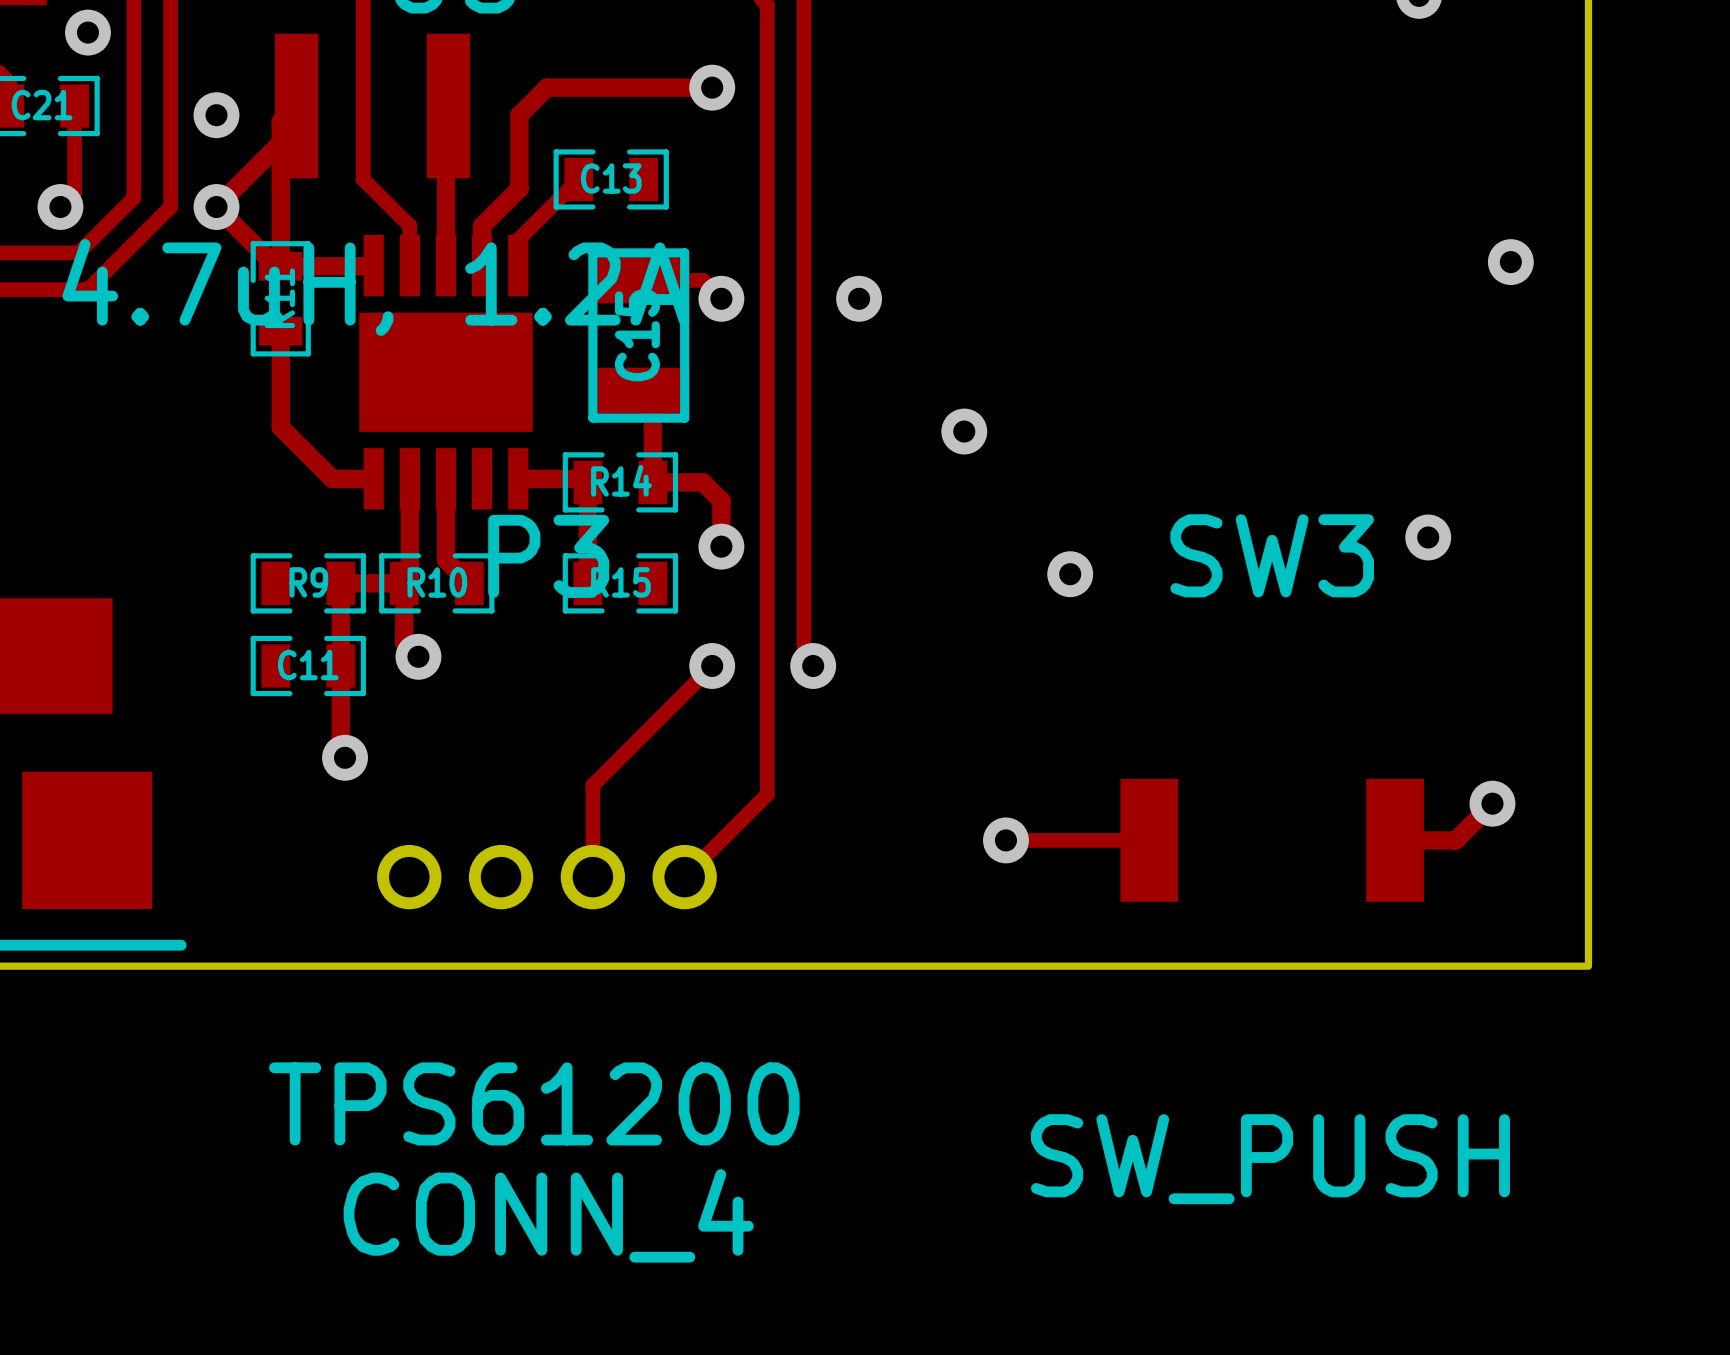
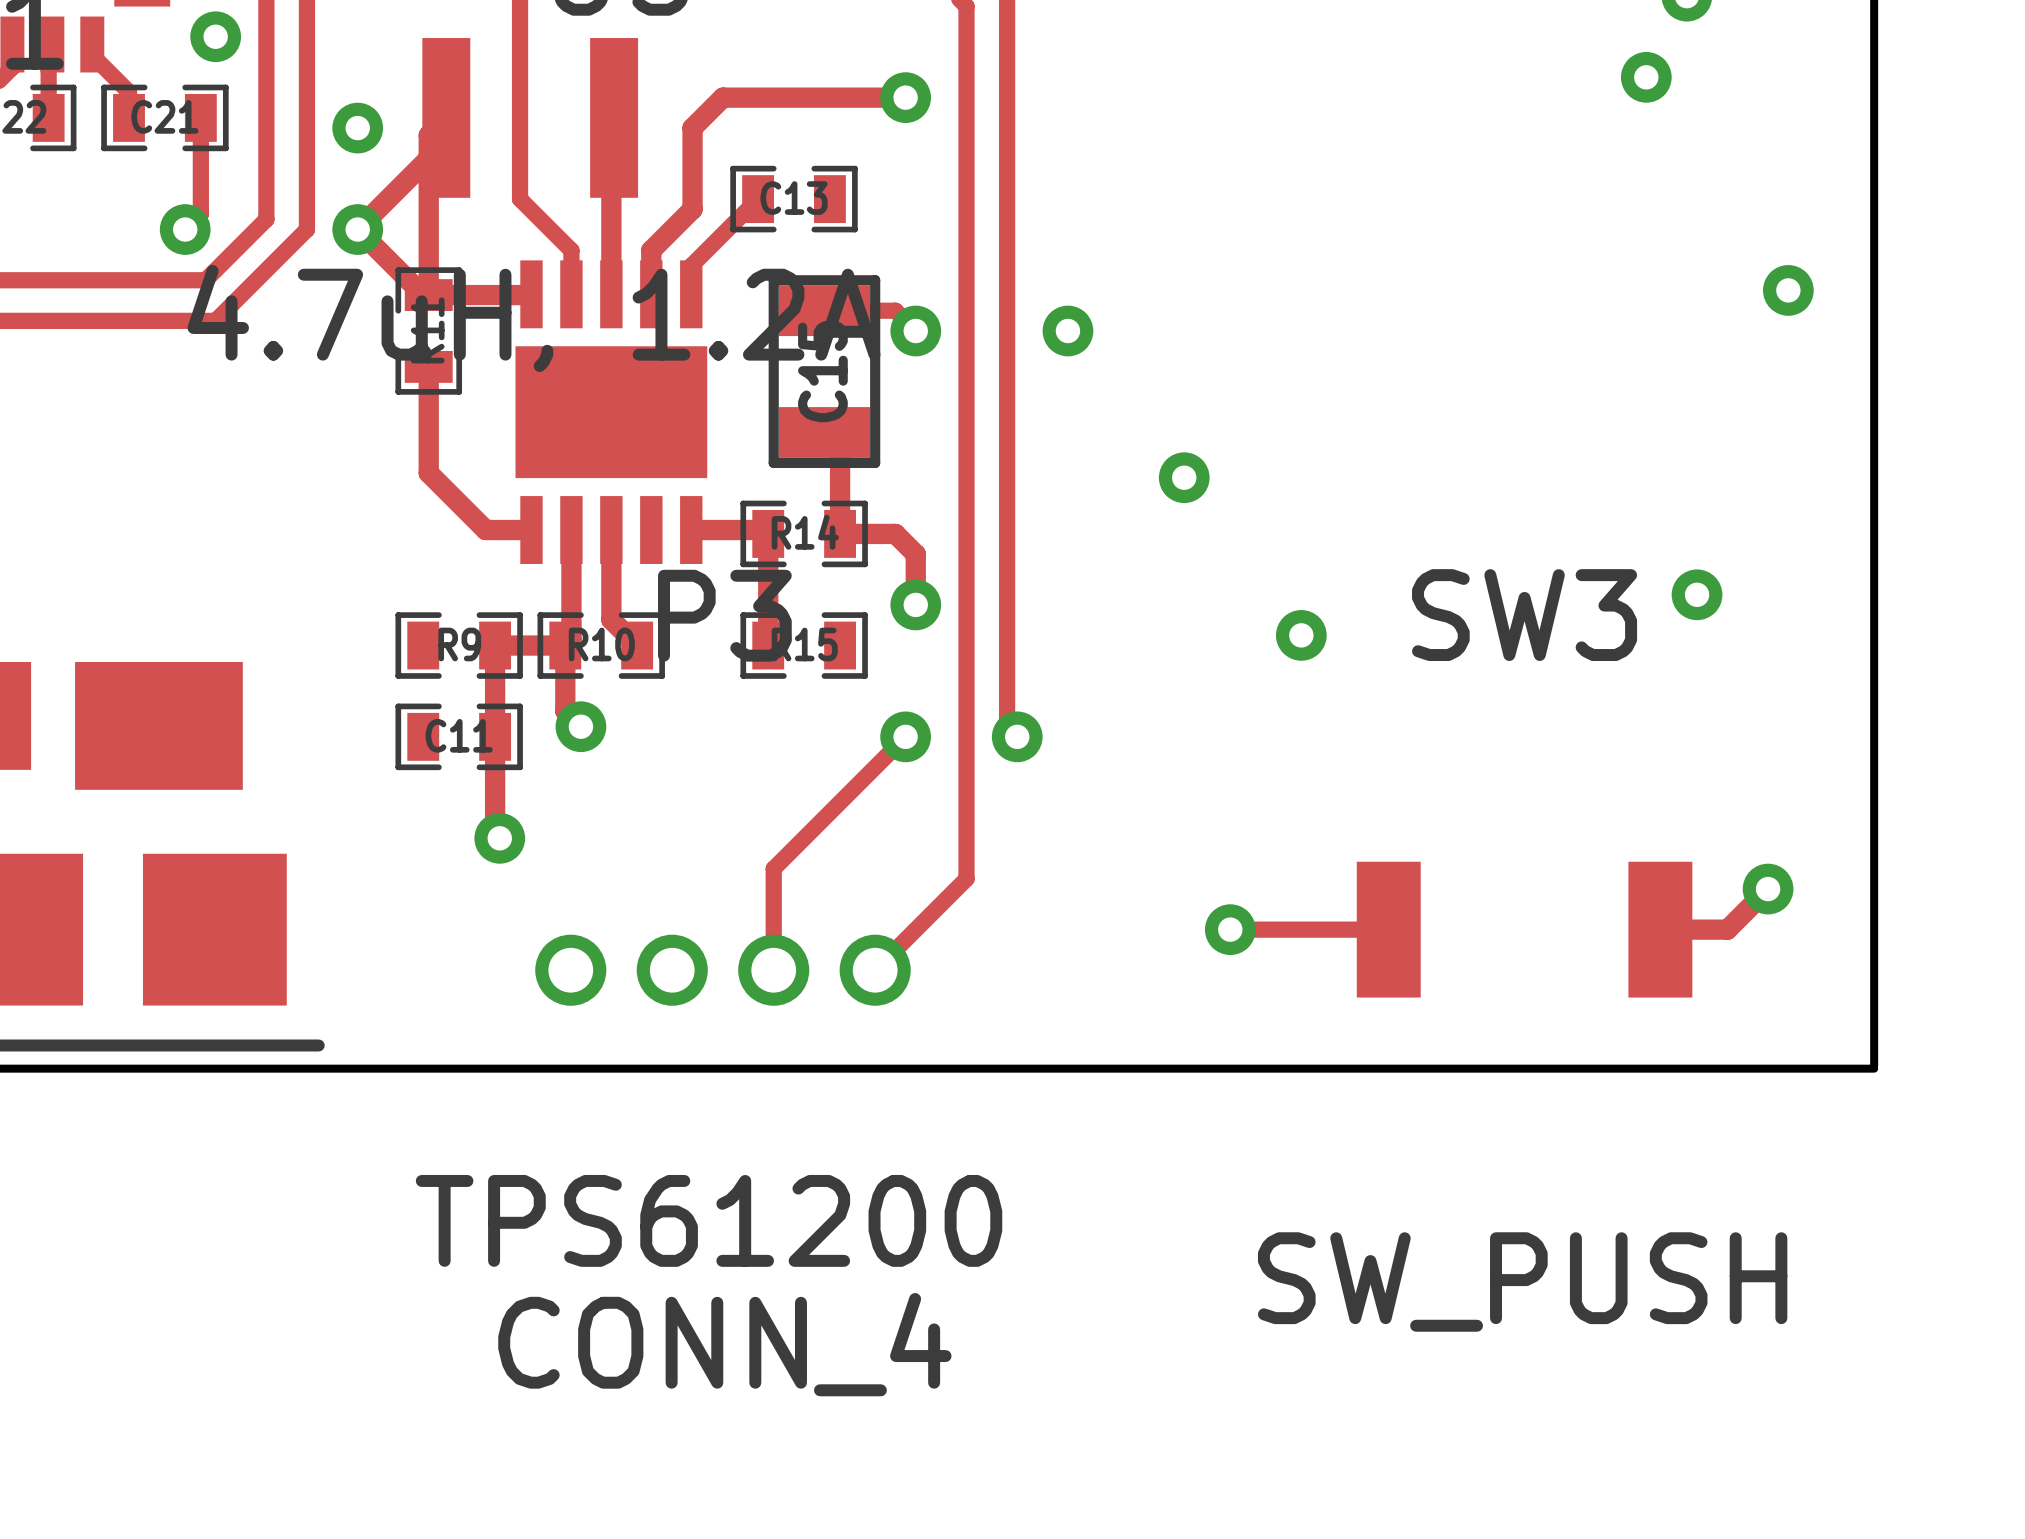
via: none -> (1646, 77)

